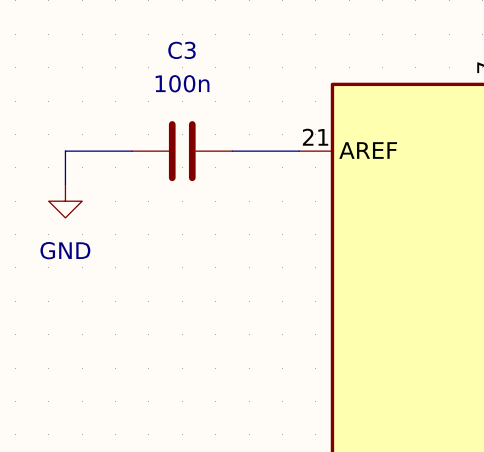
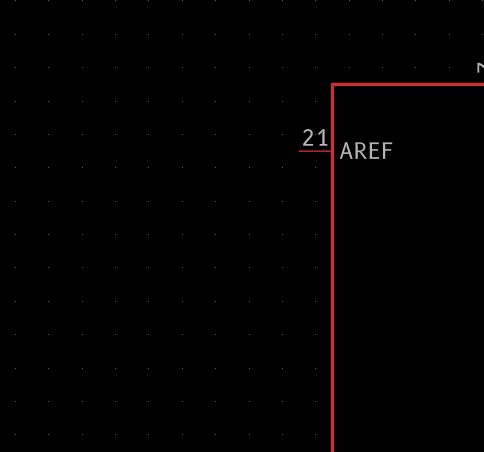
wire: (132, 151) (65, 151) (65, 184) -> none
C3: 100n (182, 151) -> none
wire: (232, 151) (299, 151) -> none
power symbol: GND (65, 201) -> none

